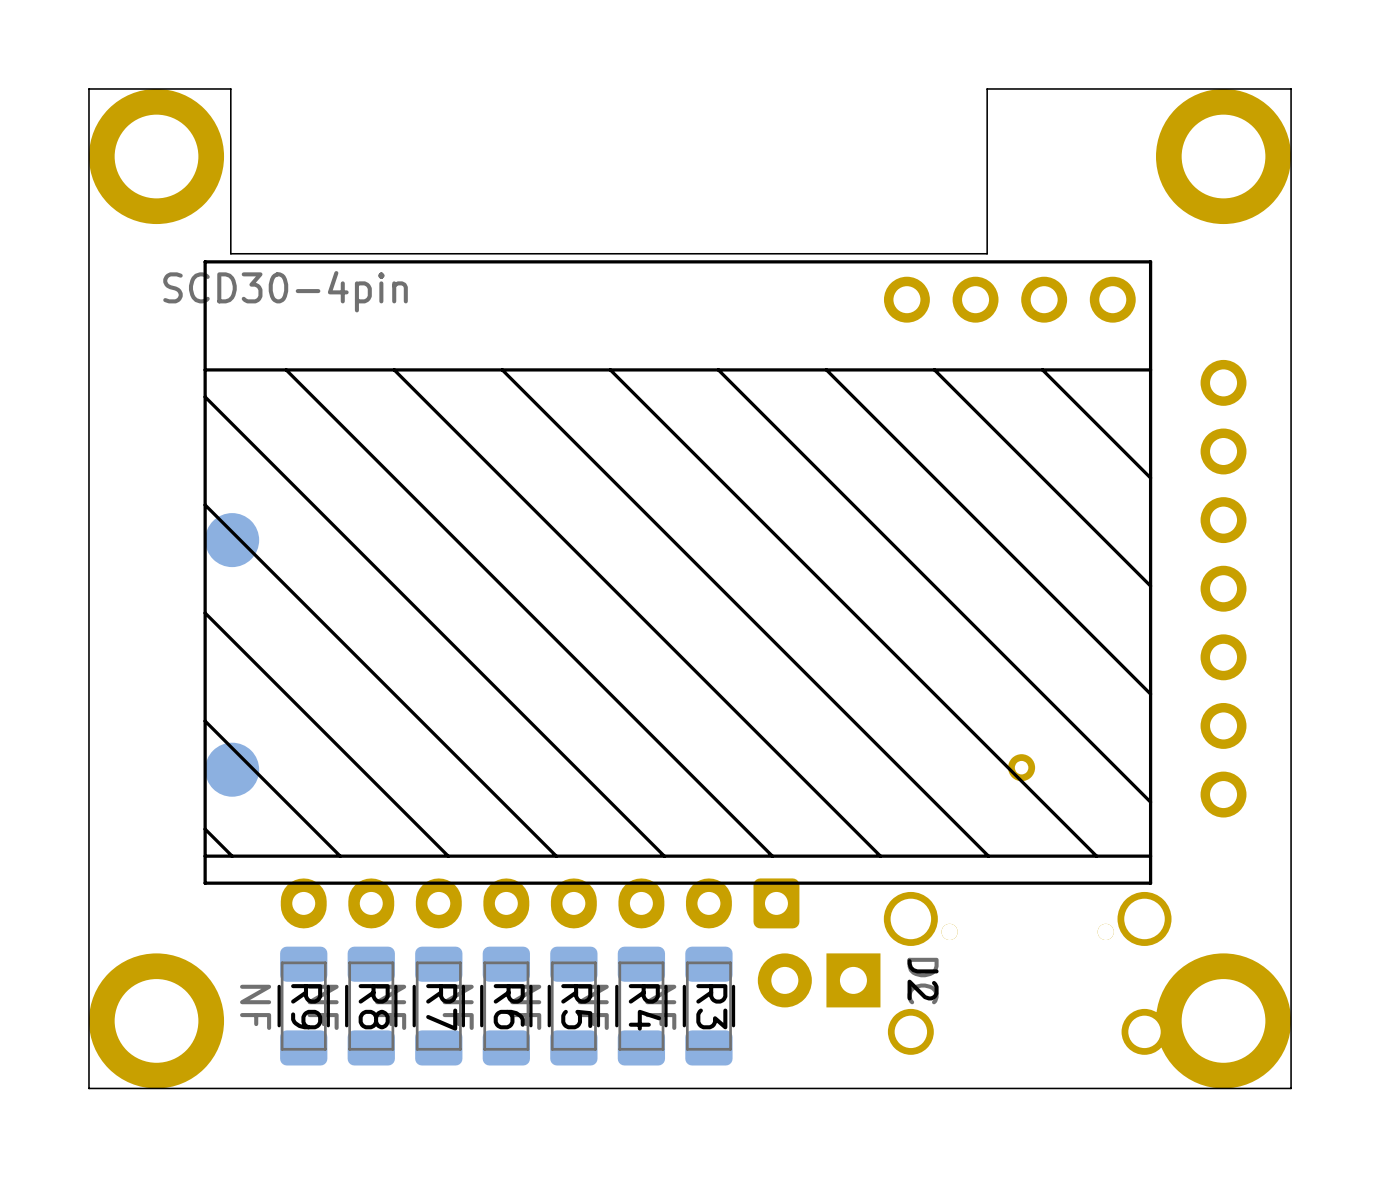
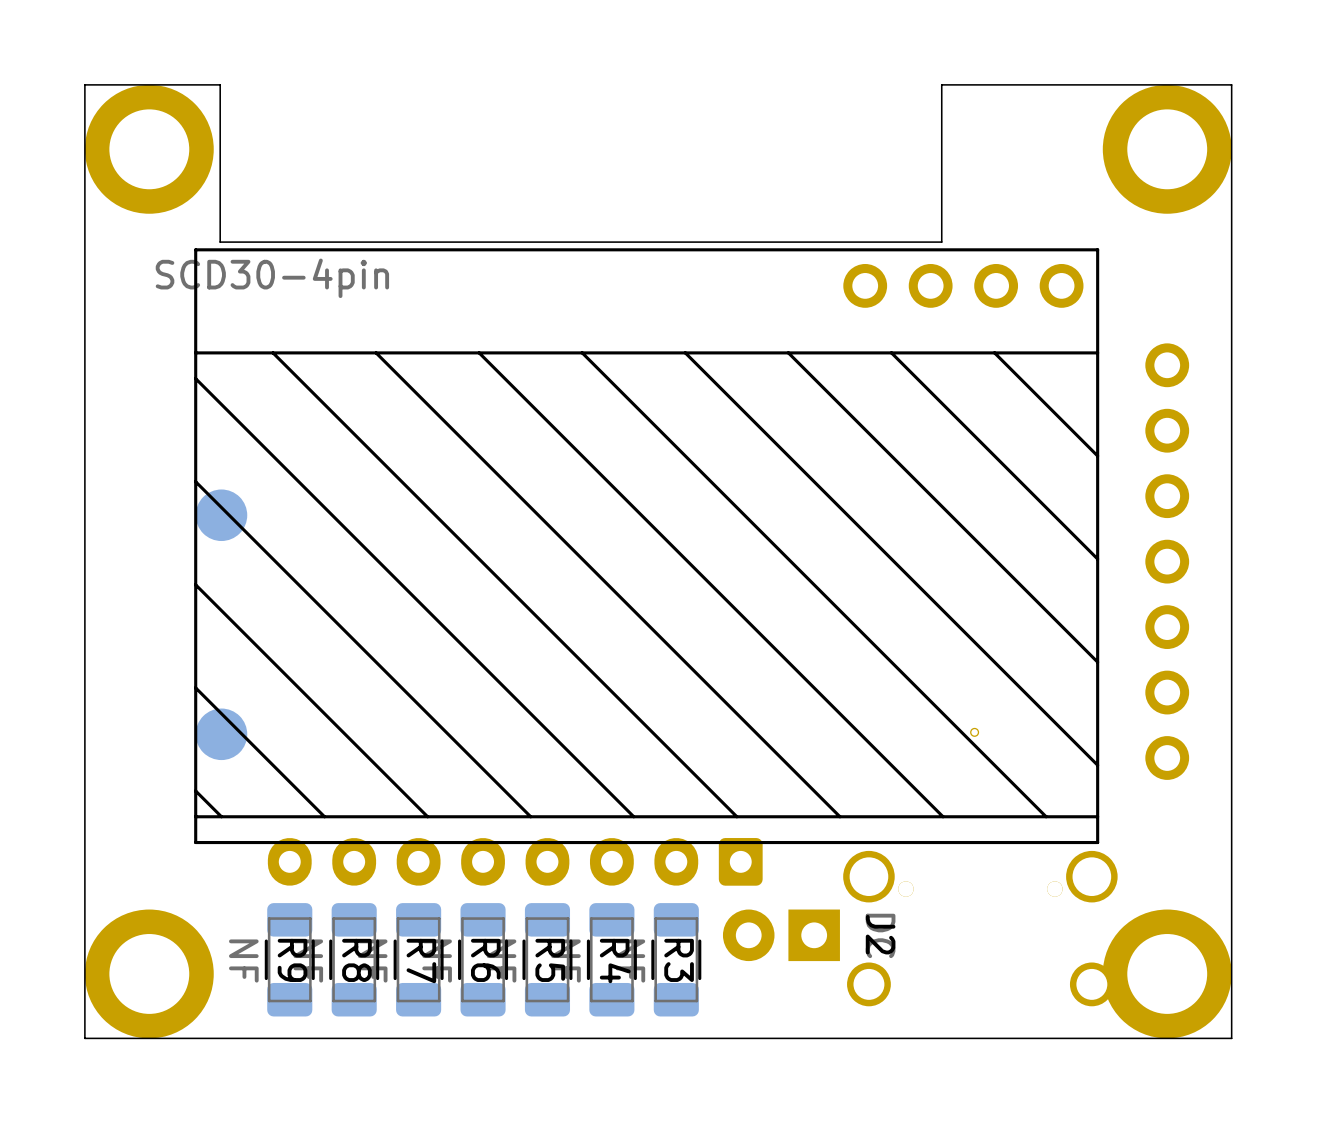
part footprint: [1008, 754, 1036, 782] -> [970, 727, 980, 737]

